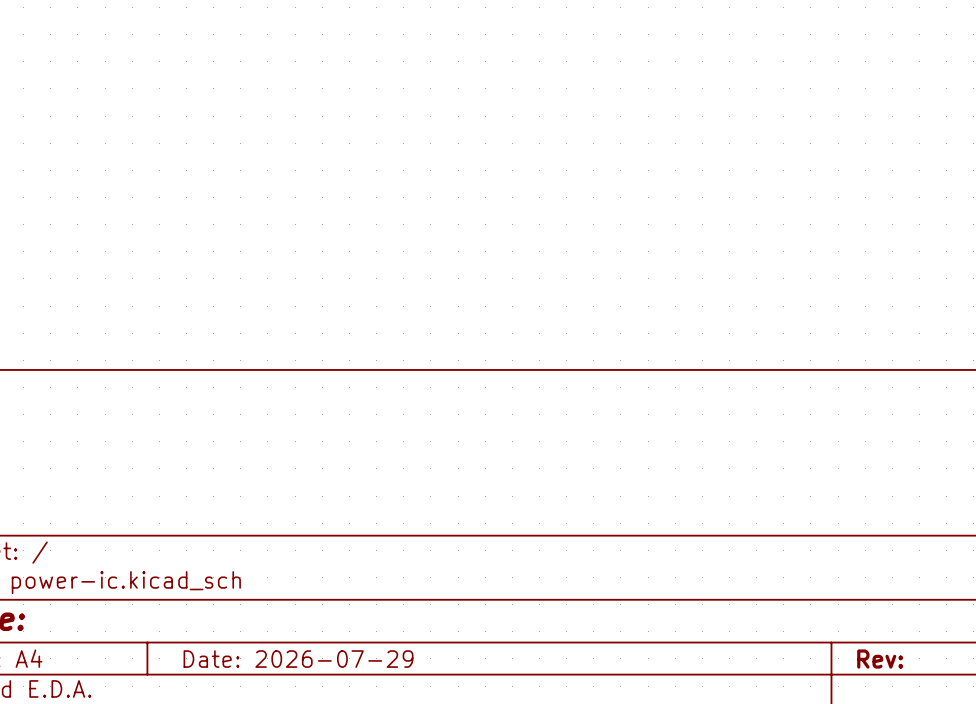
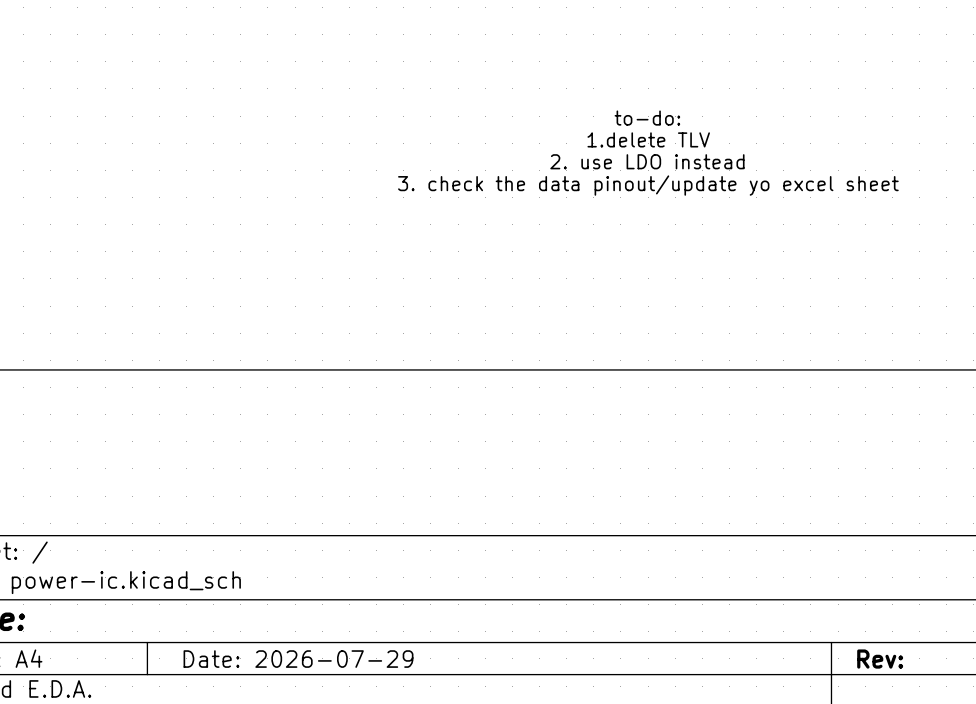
text: none -> to-do: (647, 118)
text: none -> 1.delete TLV (648, 139)
text: none -> 2. use LDO instead (647, 161)
text: none -> 3. check the data pinout/update yo excel sheet (648, 185)

